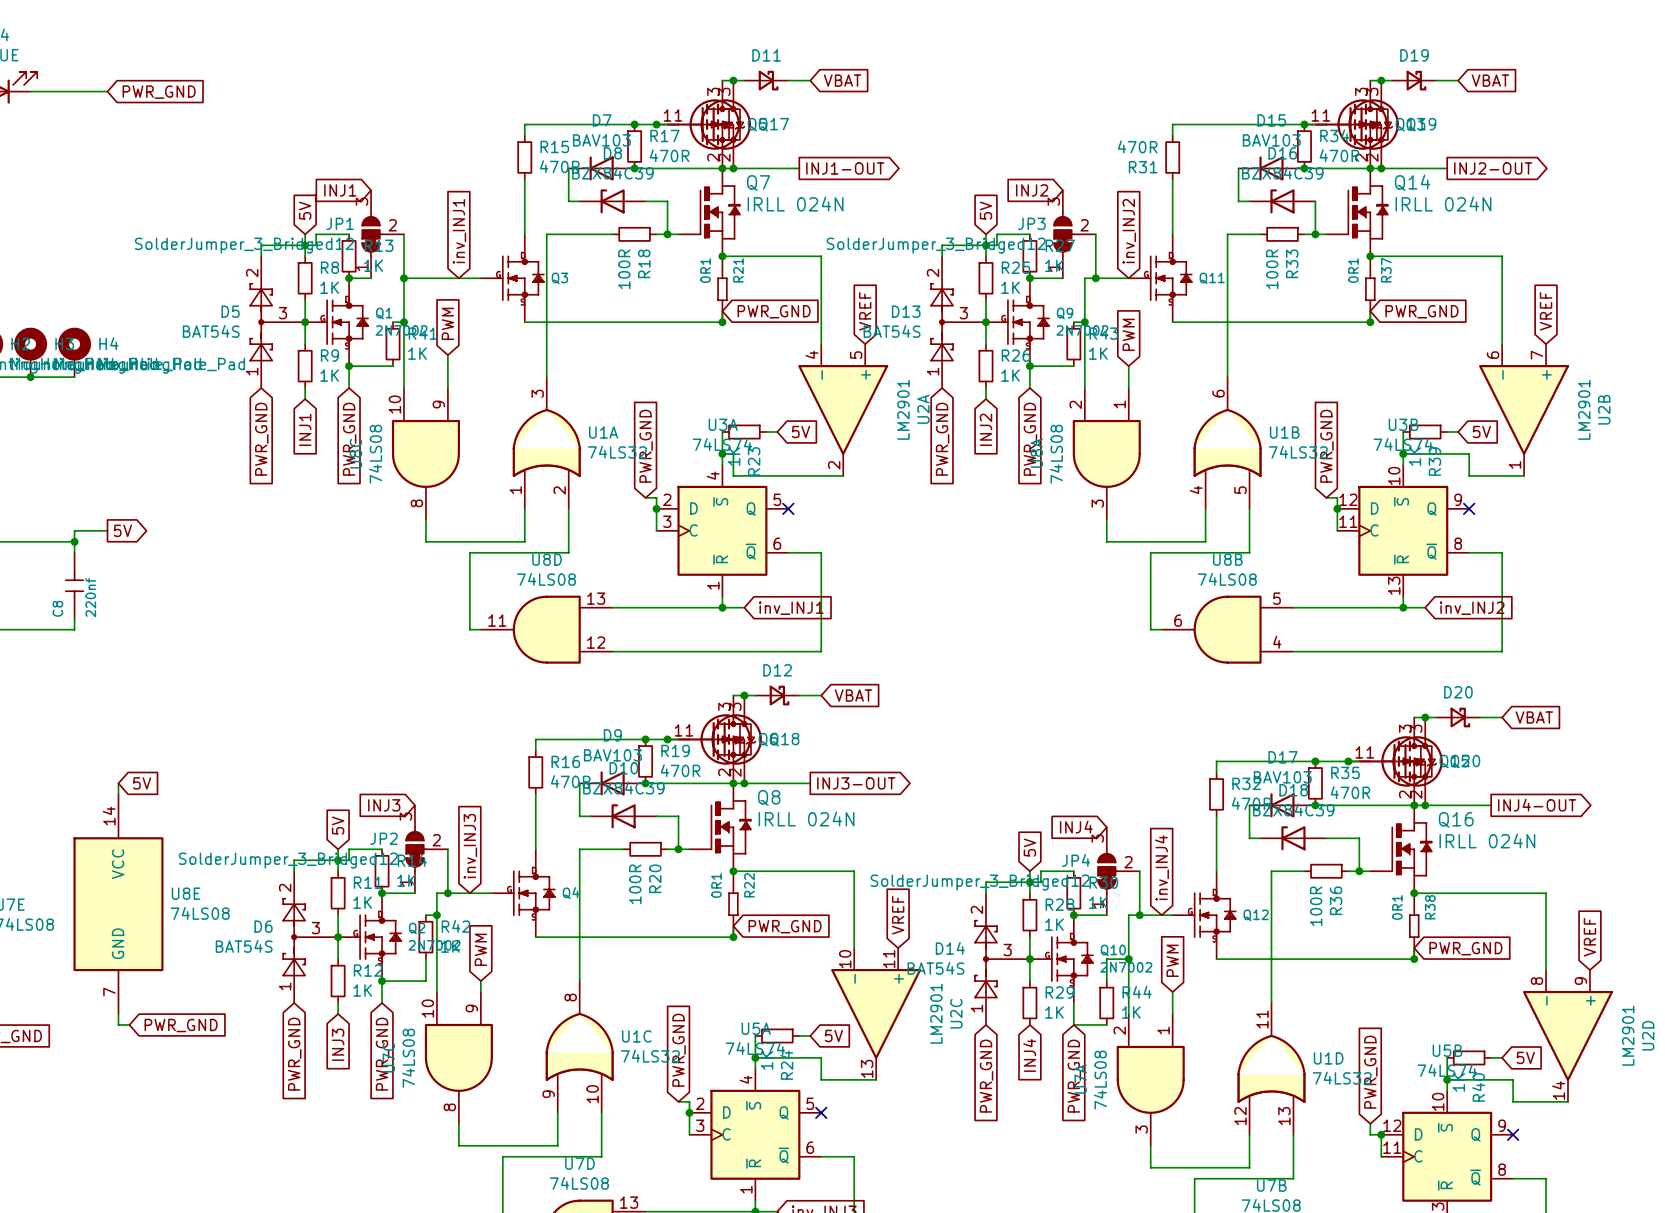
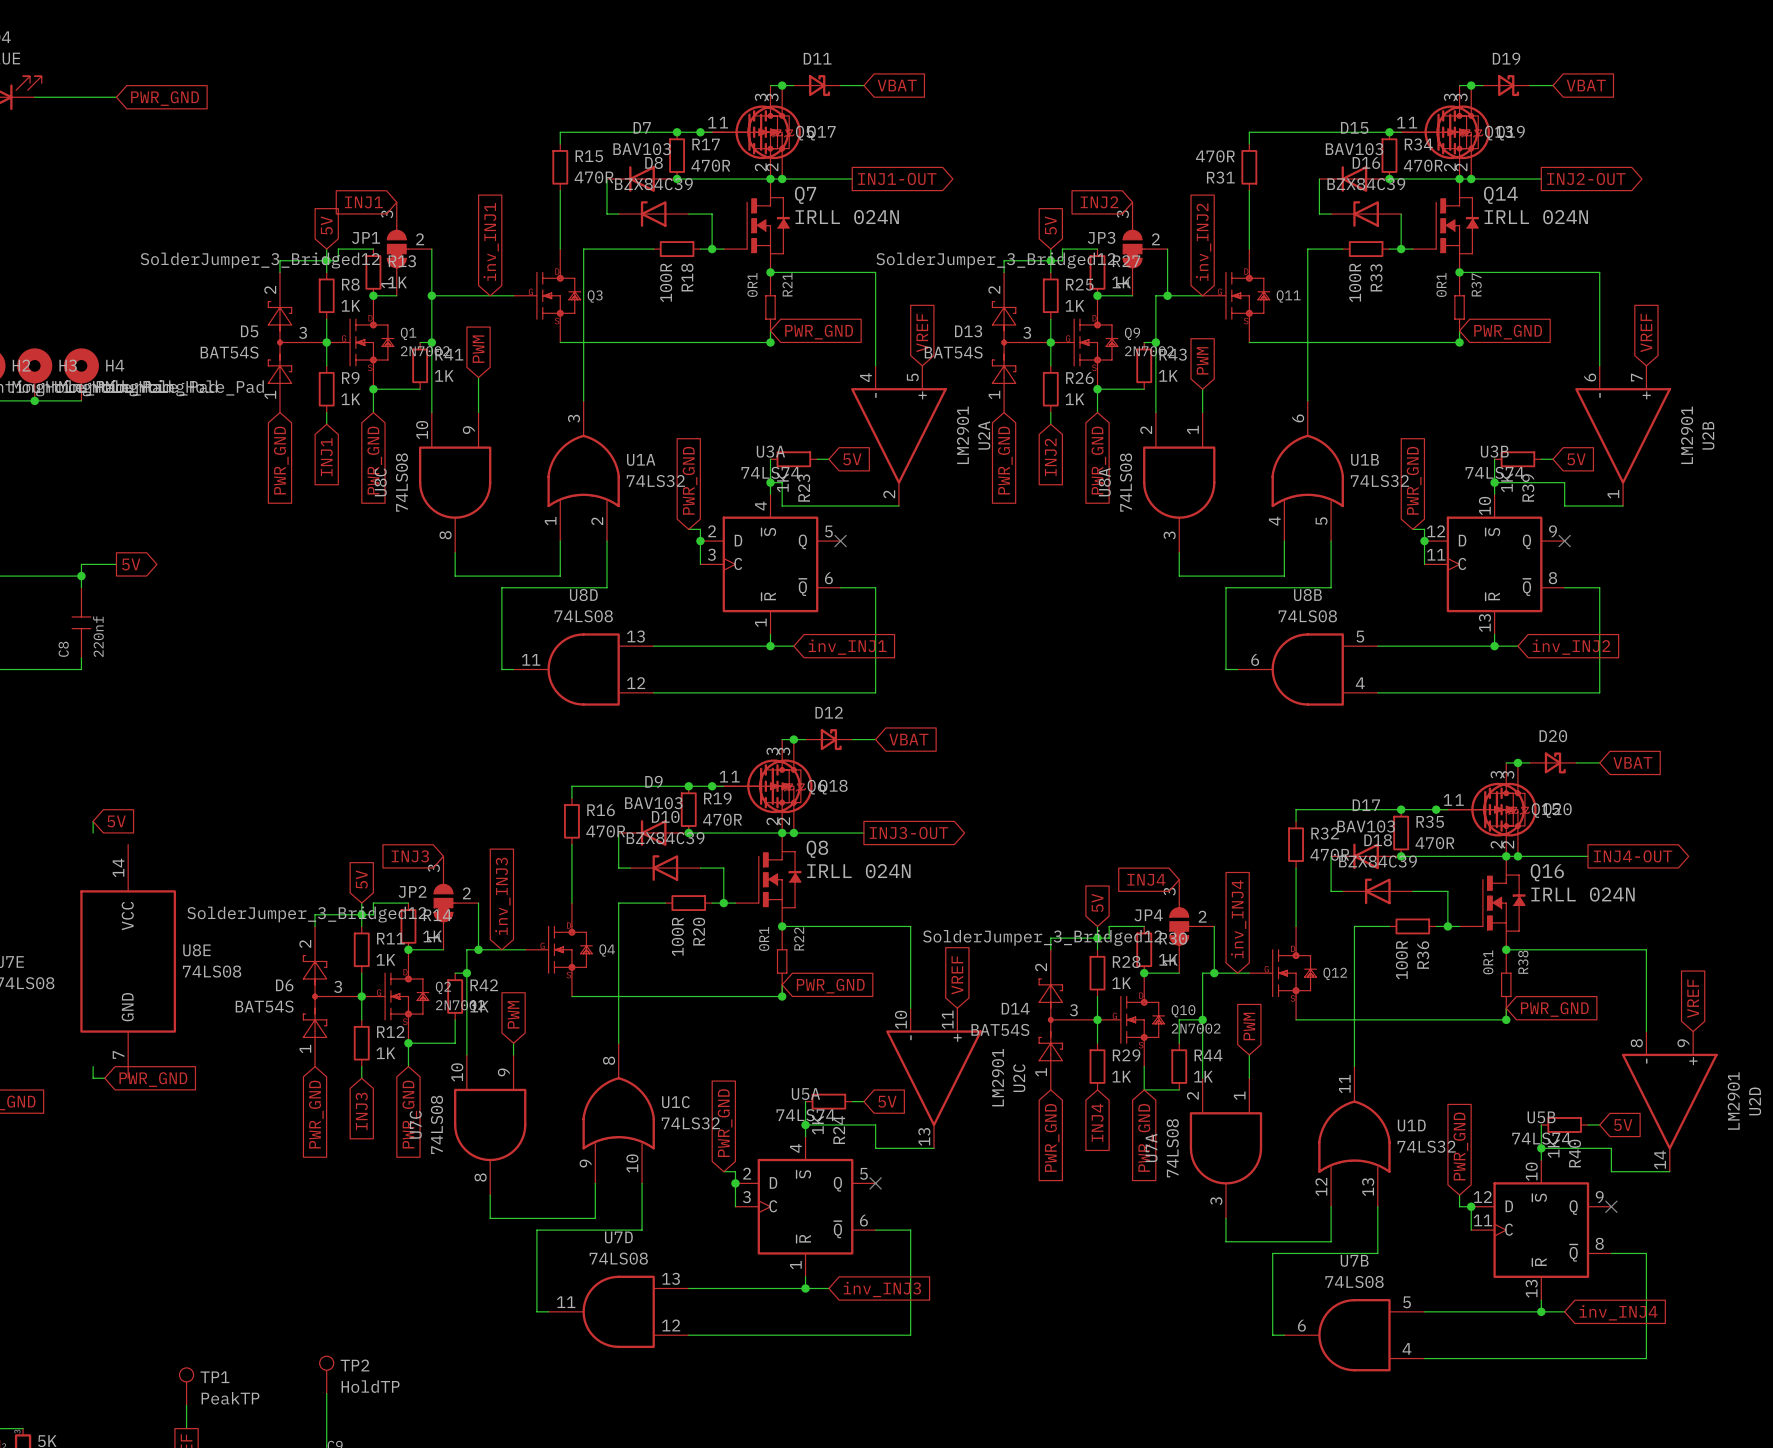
wire: (118, 783) (118, 794) -> (93, 821) (93, 833)
global label position: 5V (142, 783) -> 5V (116, 821)
wire: (118, 1014) (118, 1024) (129, 1024) -> (93, 1066) (93, 1078) (104, 1078)
global label position: PWR_GND (181, 1025) -> PWR_GND (153, 1079)

